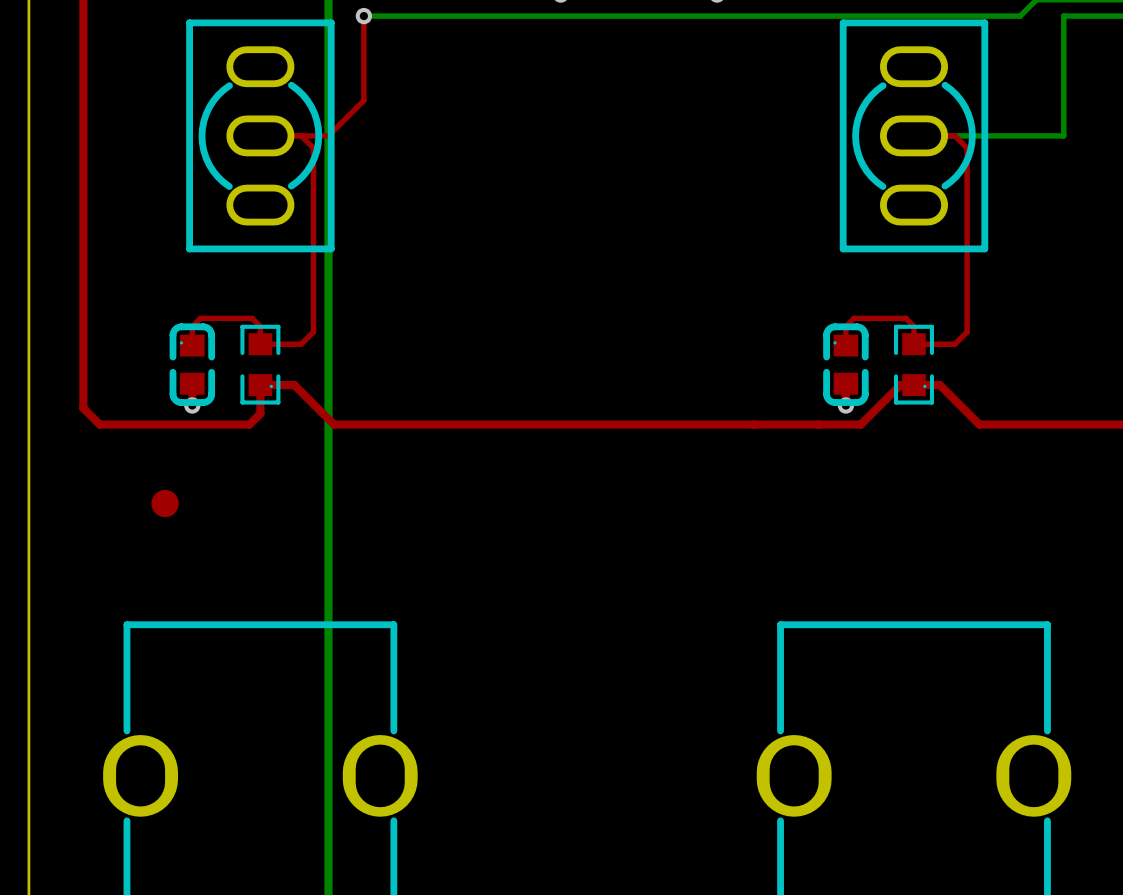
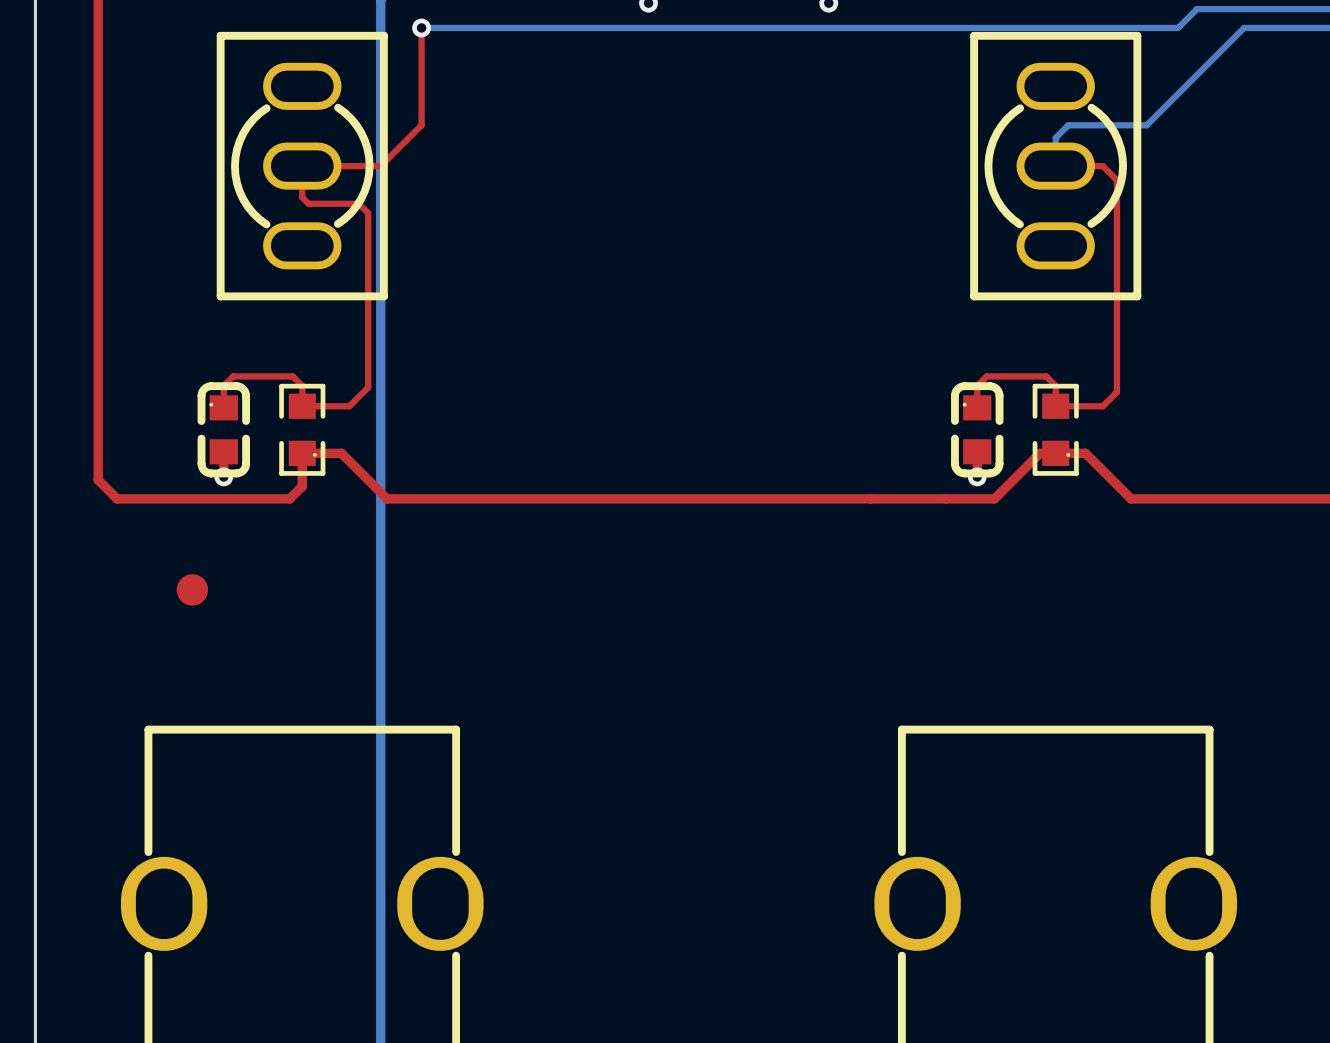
bottom track: (1077, 16) (1063, 16) (1063, 135) (914, 135) -> (1244, 27) (1146, 125) (1068, 125) (1055, 137) (1055, 166)
top track: (301, 135) (313, 148) (313, 331) -> (302, 166) (302, 197) (308, 203) (358, 203) (368, 213) (368, 387) (363, 392)

